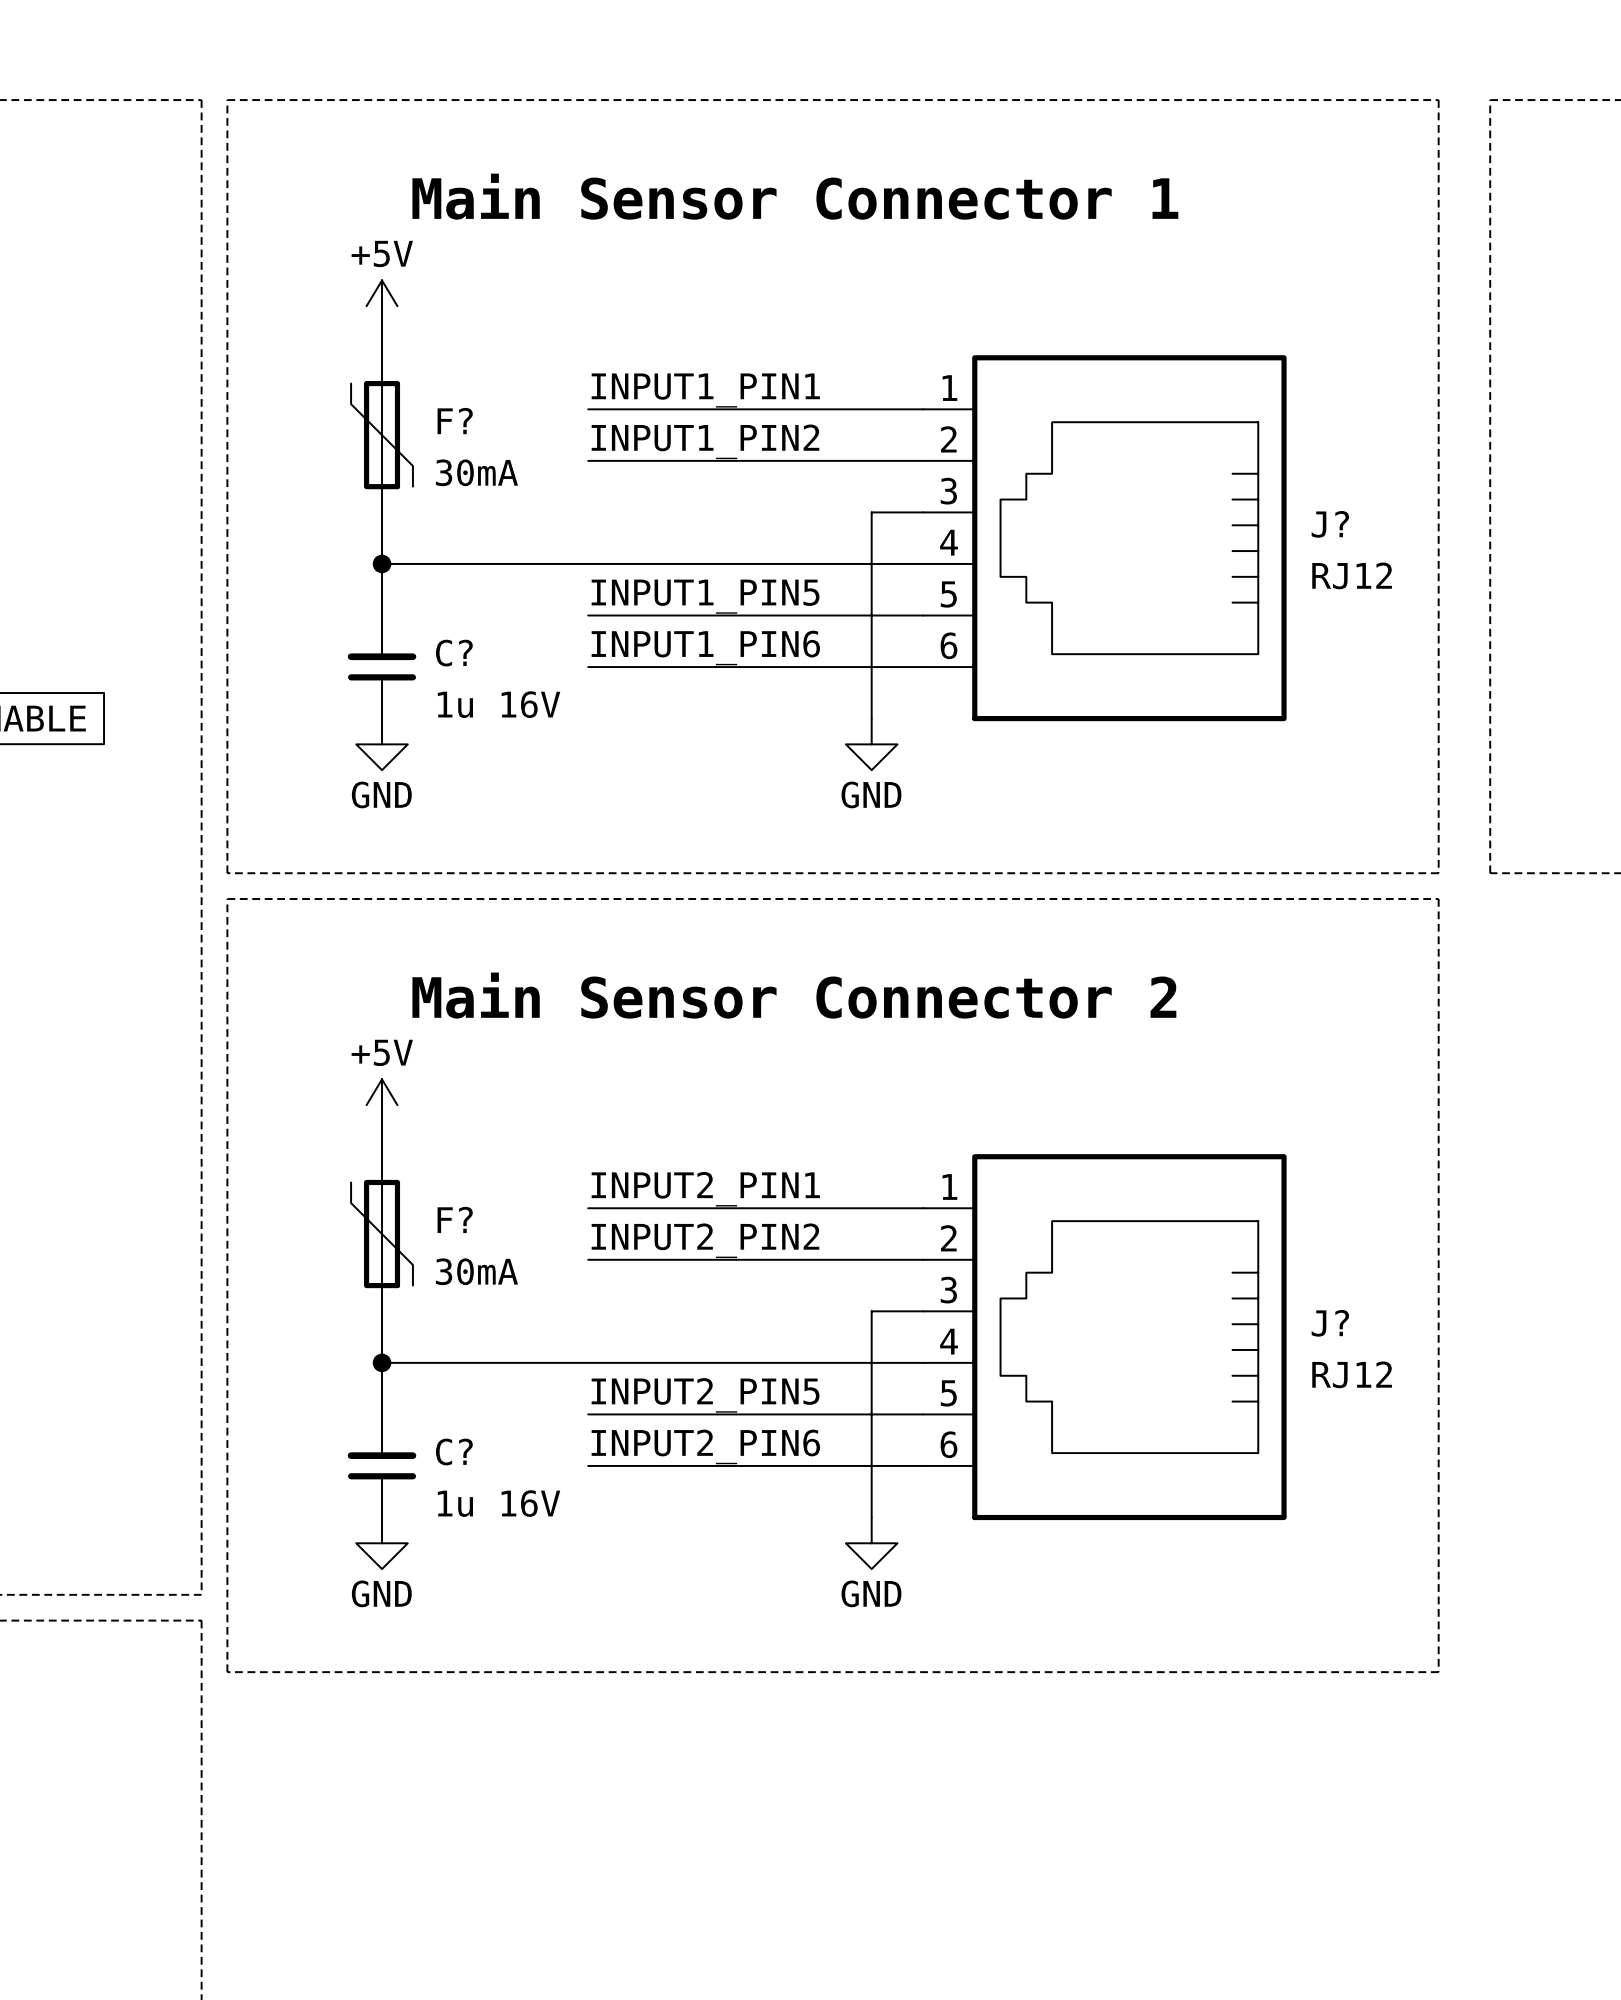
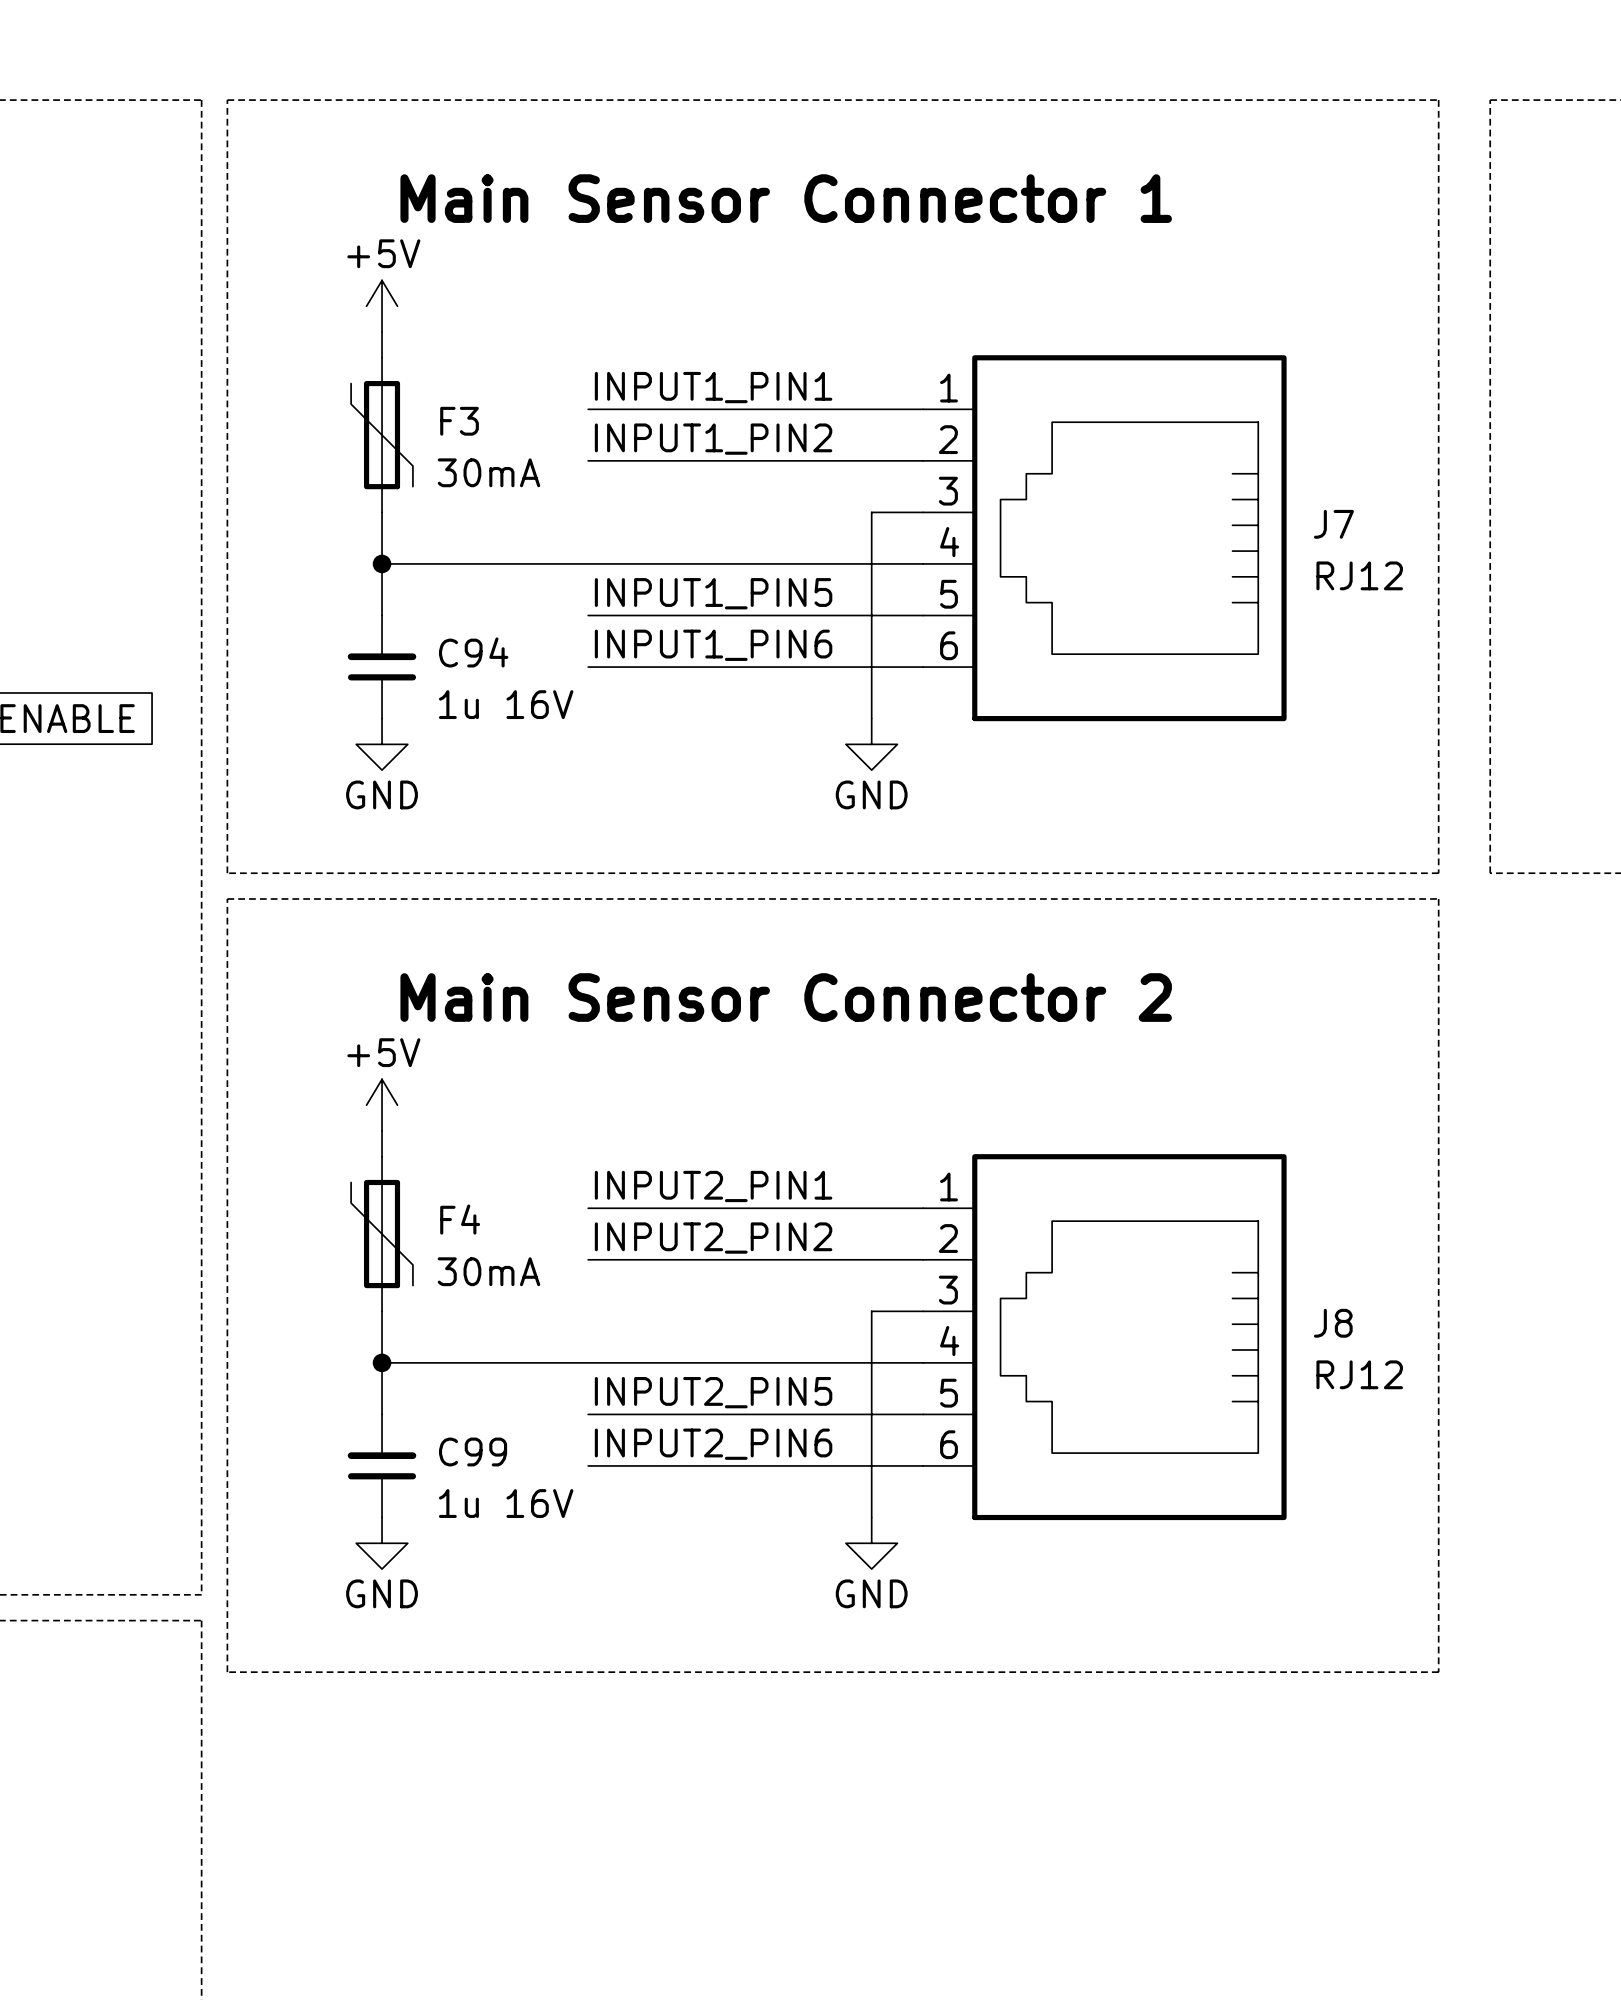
F? name: F? (455, 421) -> F3 (459, 421)
J? name: J? (1330, 524) -> J7 (1333, 524)
C? name: C? (454, 653) -> C94 (473, 652)
F? name: F? (455, 1219) -> F4 (460, 1219)
J? name: J? (1330, 1323) -> J8 (1333, 1323)
C? name: C? (454, 1452) -> C99 (473, 1451)

